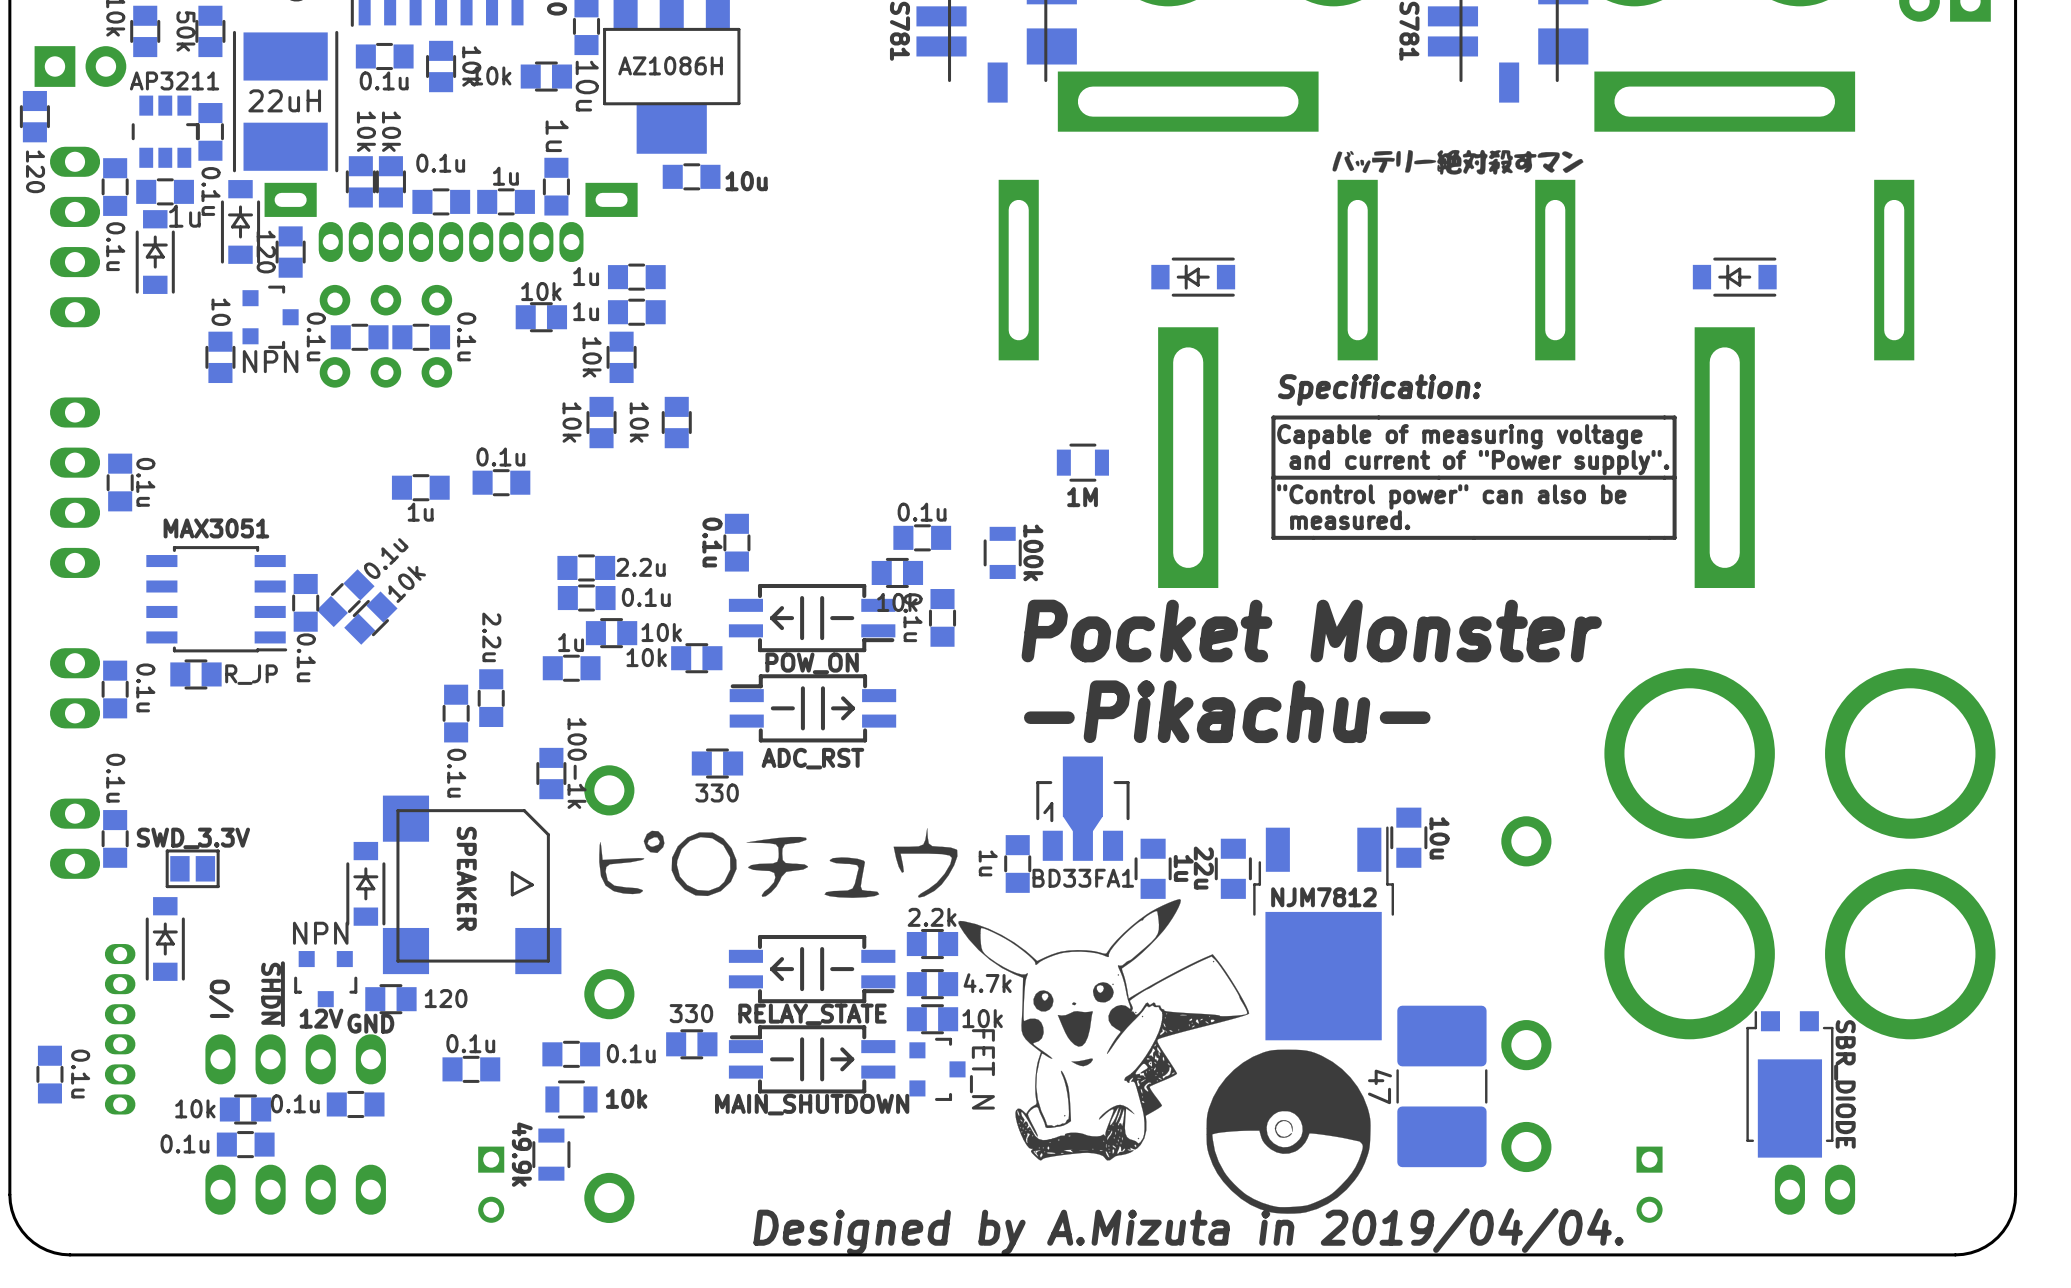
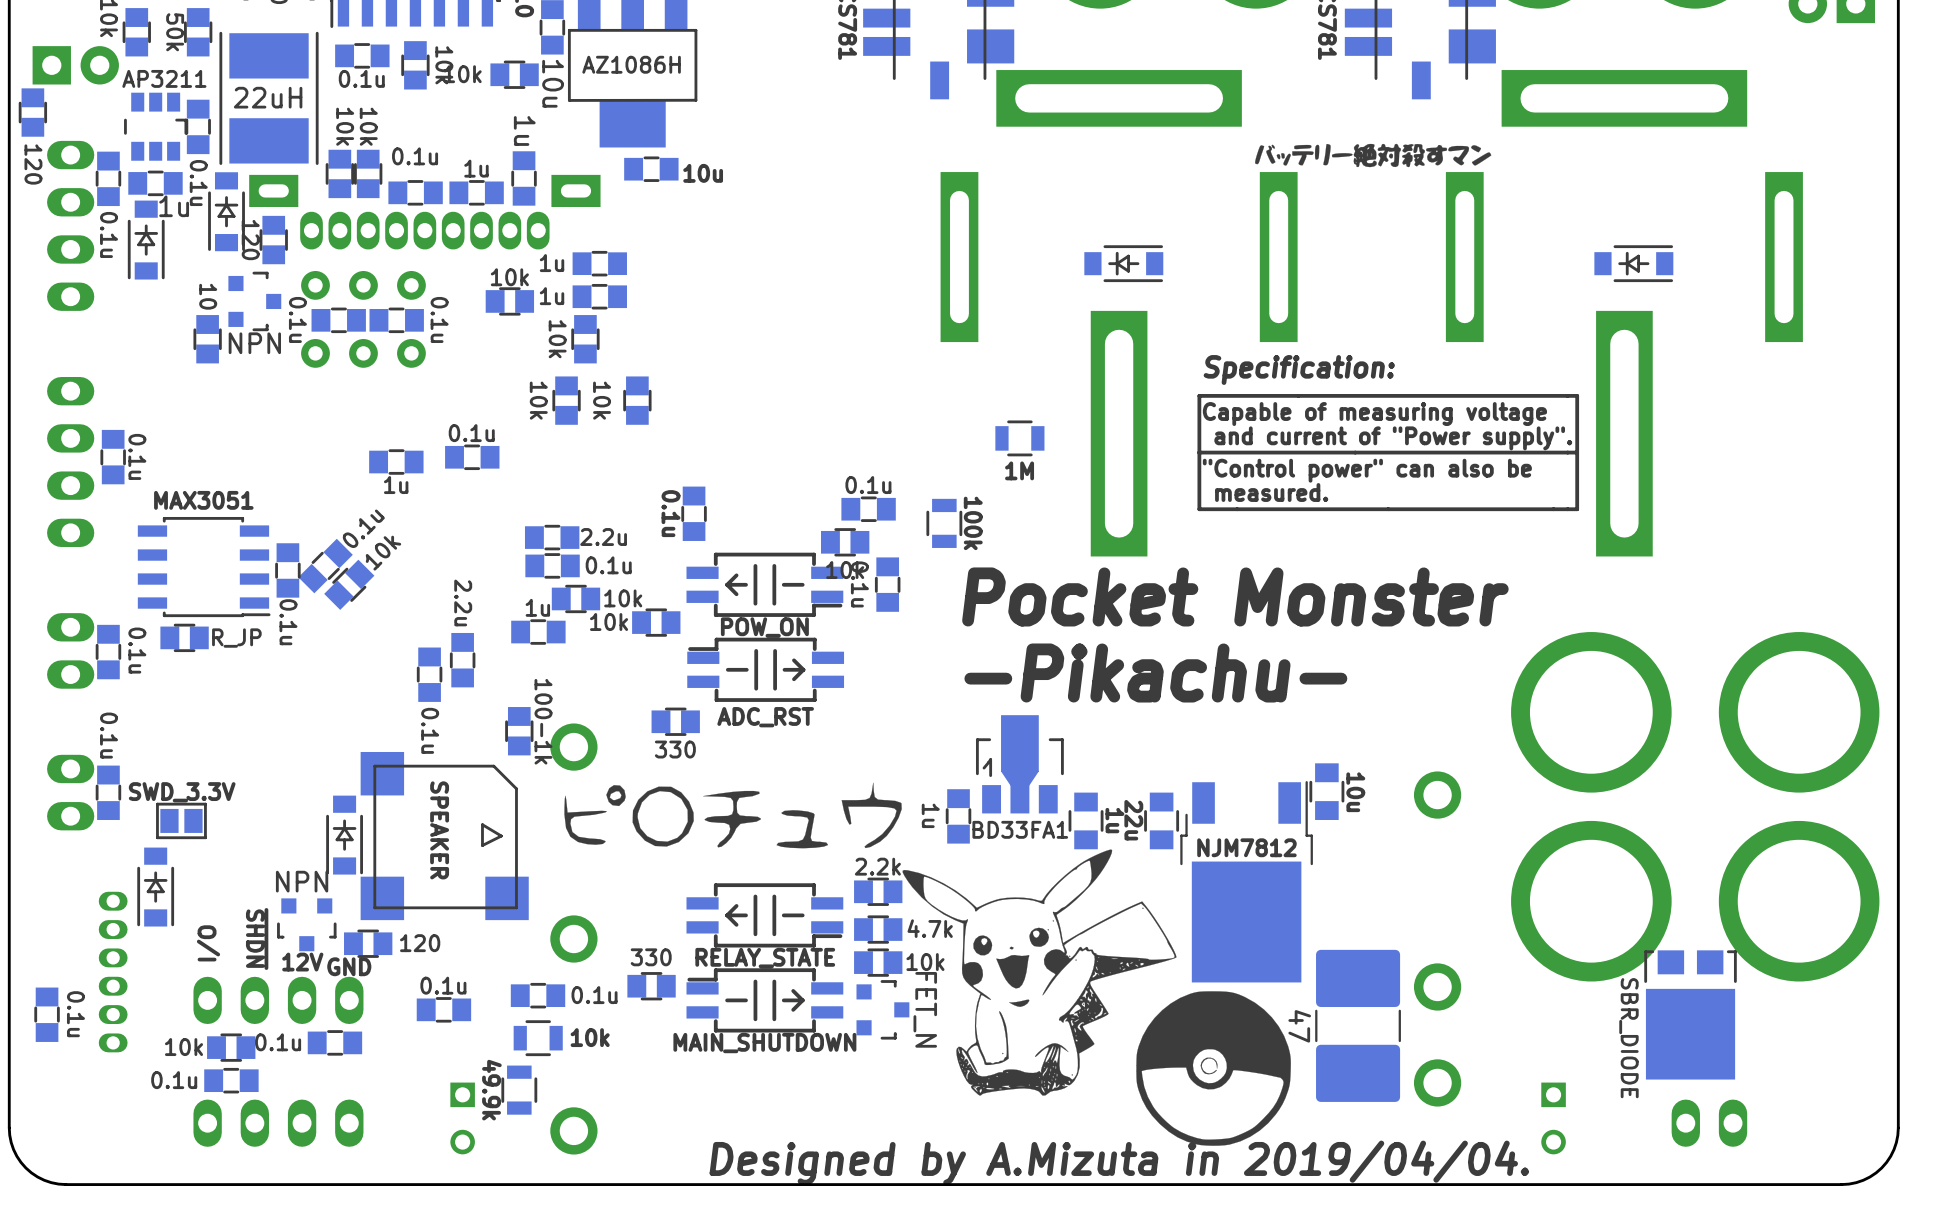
part footprint: [1746, 1011, 1834, 1158] -> [1644, 950, 1737, 1080]
part value position: SBR_DIODE (1844, 1084) -> SBR_DIODE (1628, 1038)

